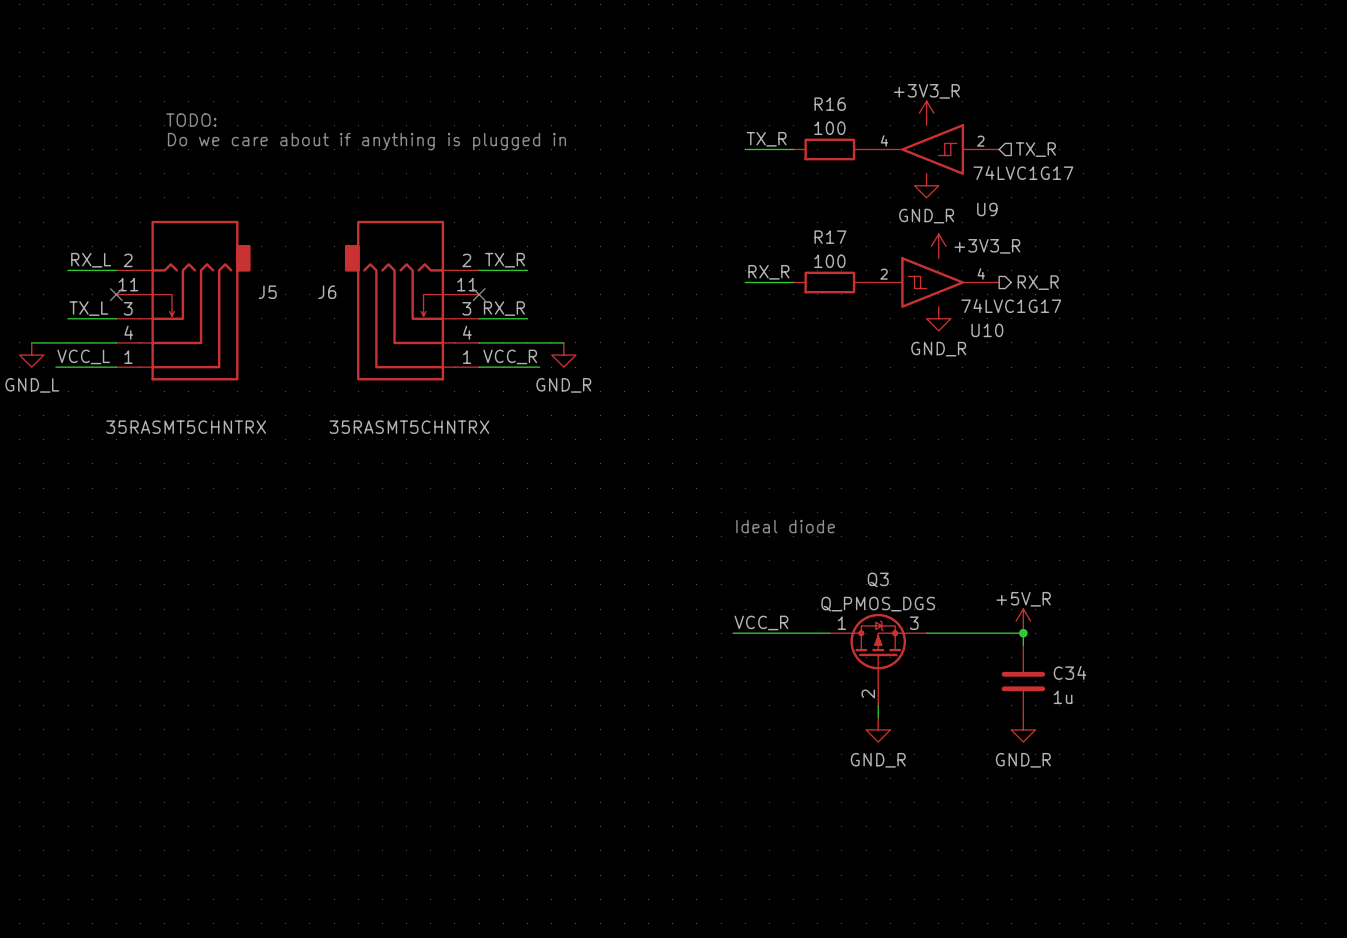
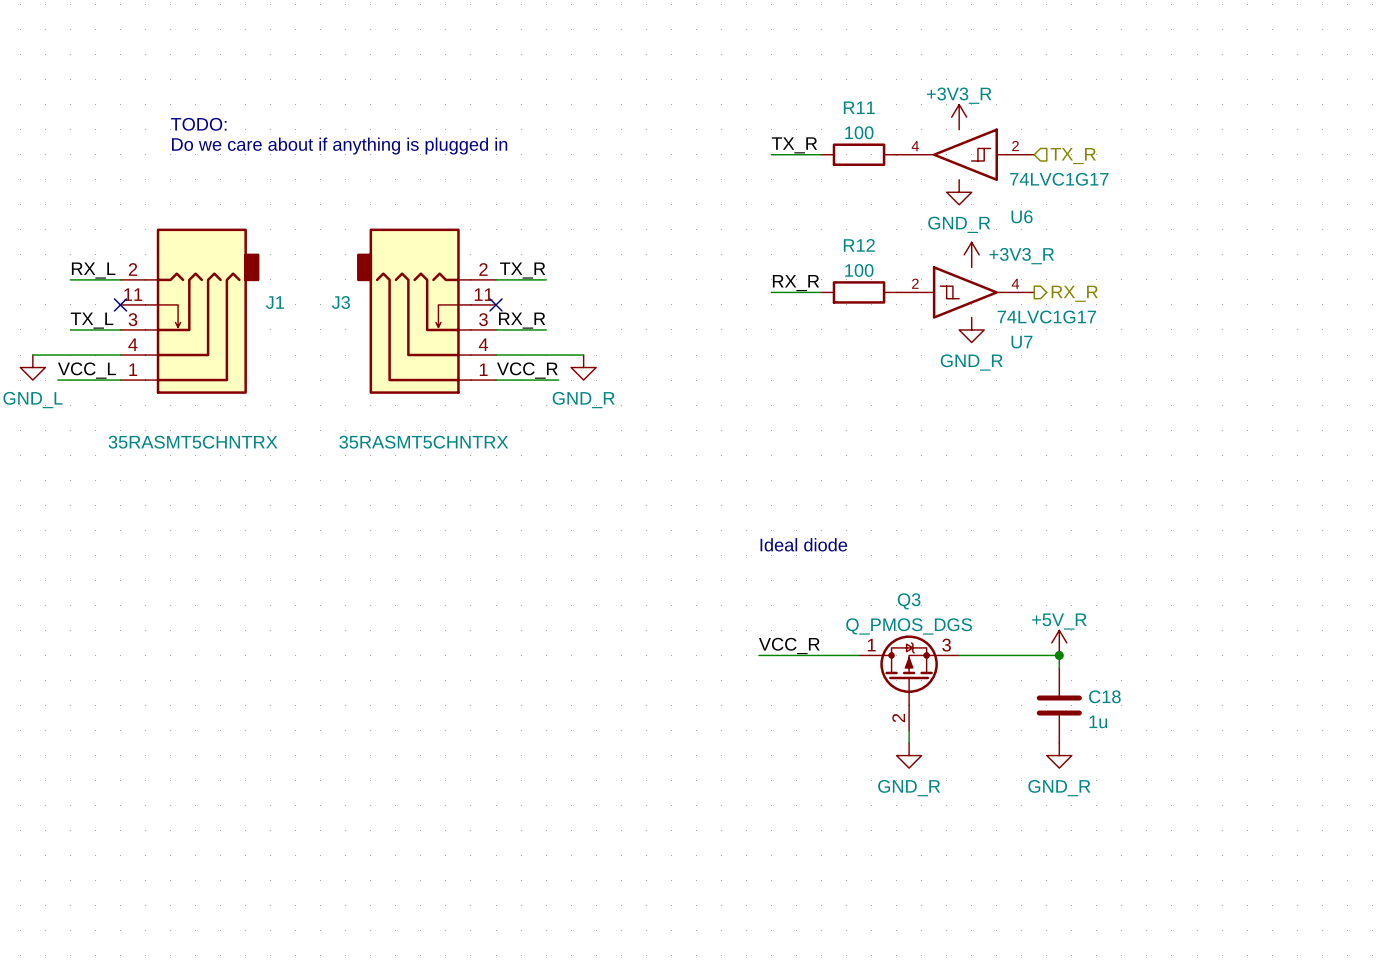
R16 name: R16 (830, 104) -> R11 (859, 107)
U9 name: U9 (987, 209) -> U6 (1022, 216)
R17 name: R17 (830, 237) -> R12 (859, 245)
J5 name: J5 (267, 292) -> J1 (274, 302)
J6 name: J6 (327, 292) -> J3 (340, 302)
U10 name: U10 (987, 330) -> U7 (1022, 342)
C34 name: C34 (1069, 672) -> C18 (1104, 696)

